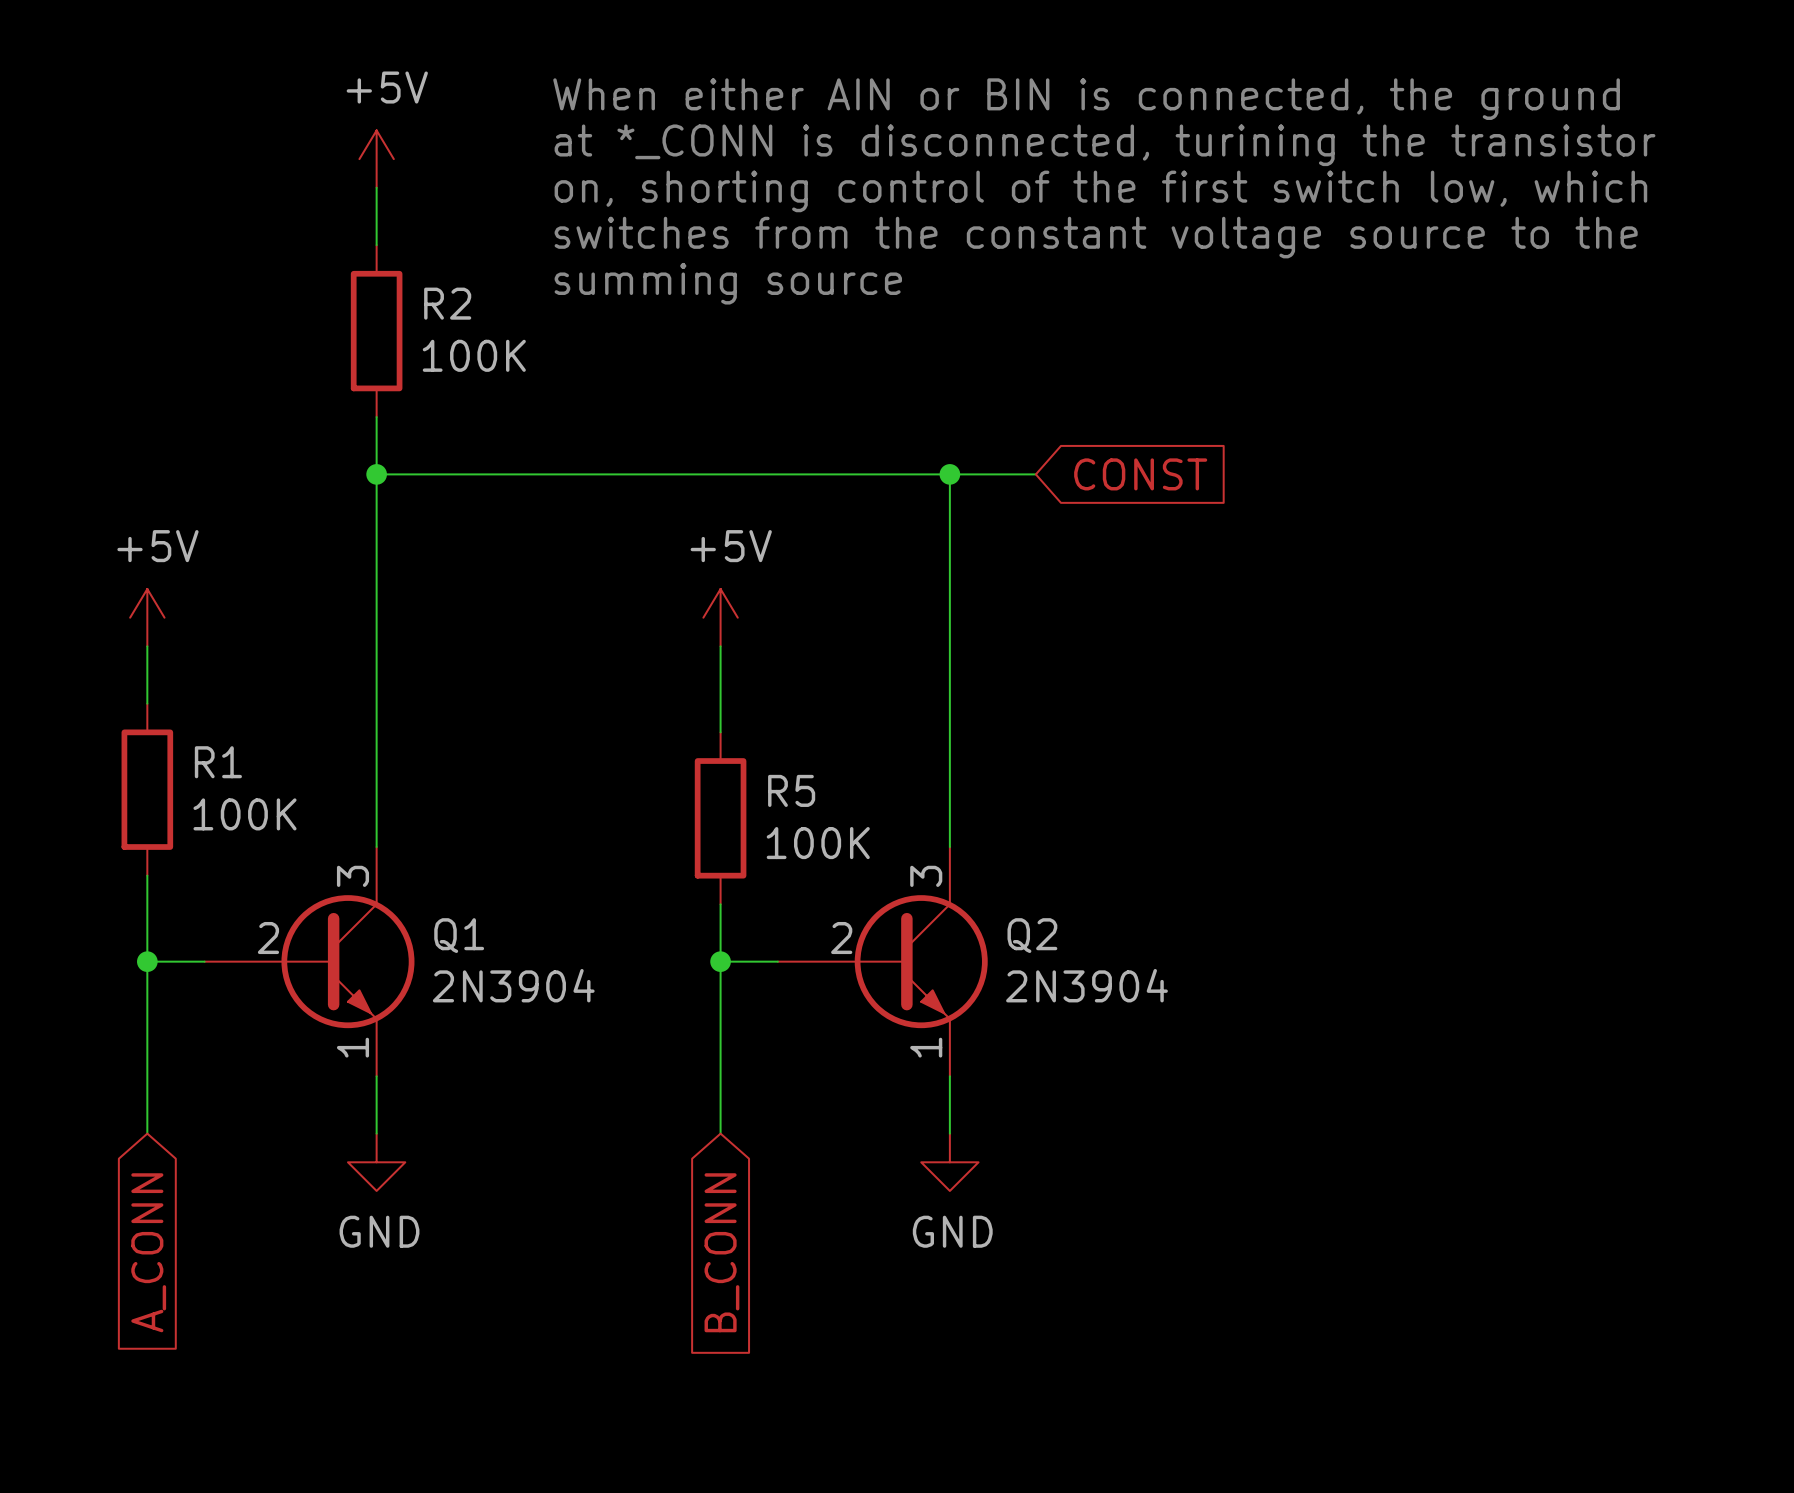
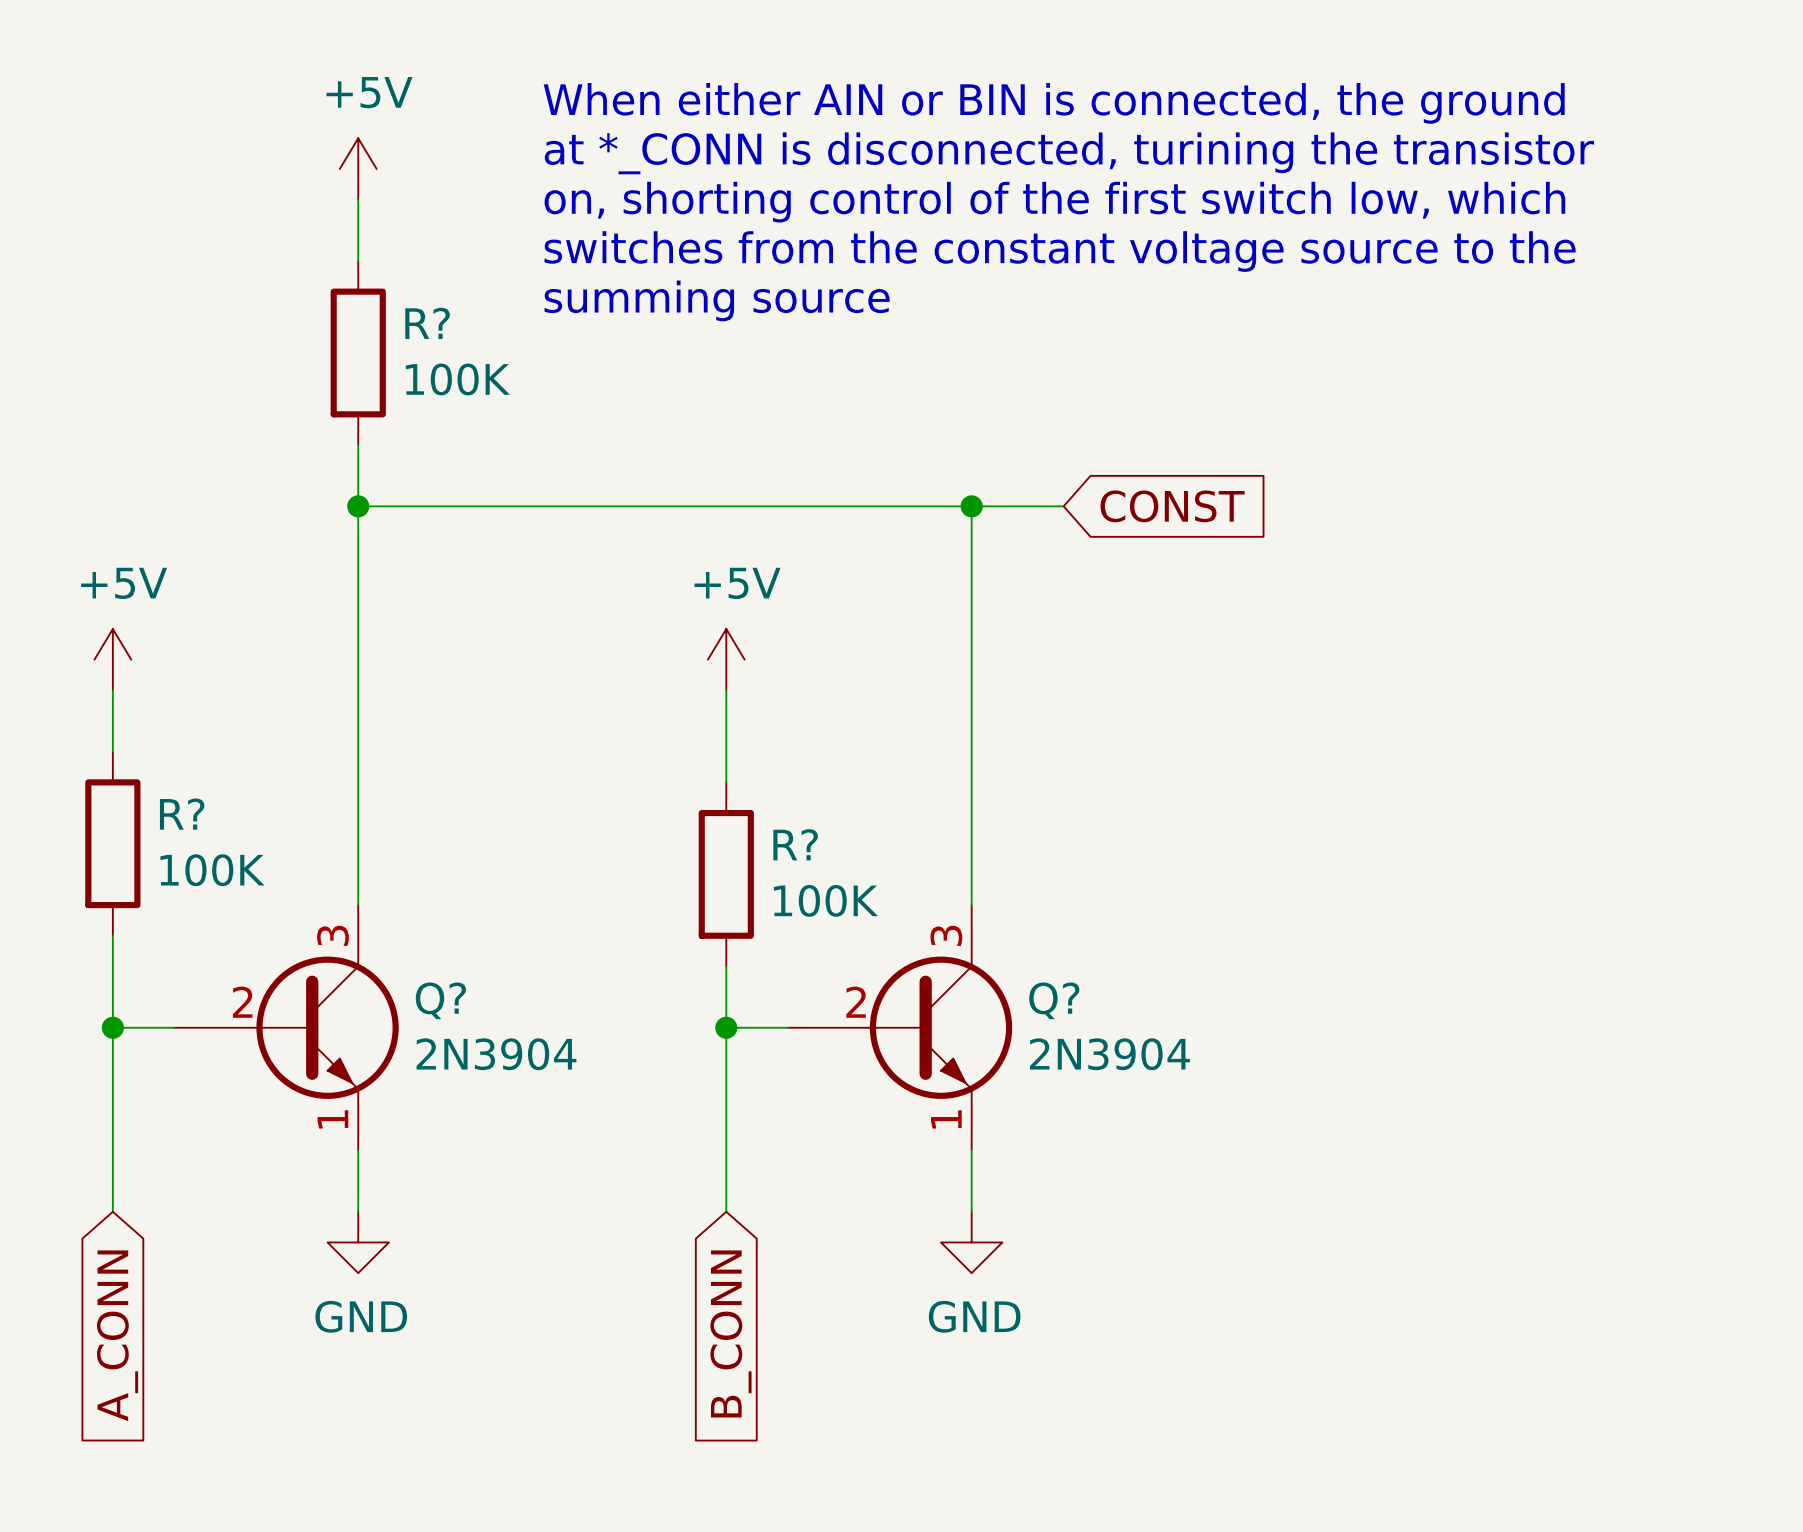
R2 name: R2 (447, 303) -> R? (427, 323)
R1 name: R1 (218, 762) -> R? (182, 814)
R5 name: R5 (791, 790) -> R? (795, 844)
Q1 name: Q1 (459, 935) -> Q? (440, 1000)
Q2 name: Q2 (1032, 935) -> Q? (1054, 1000)

